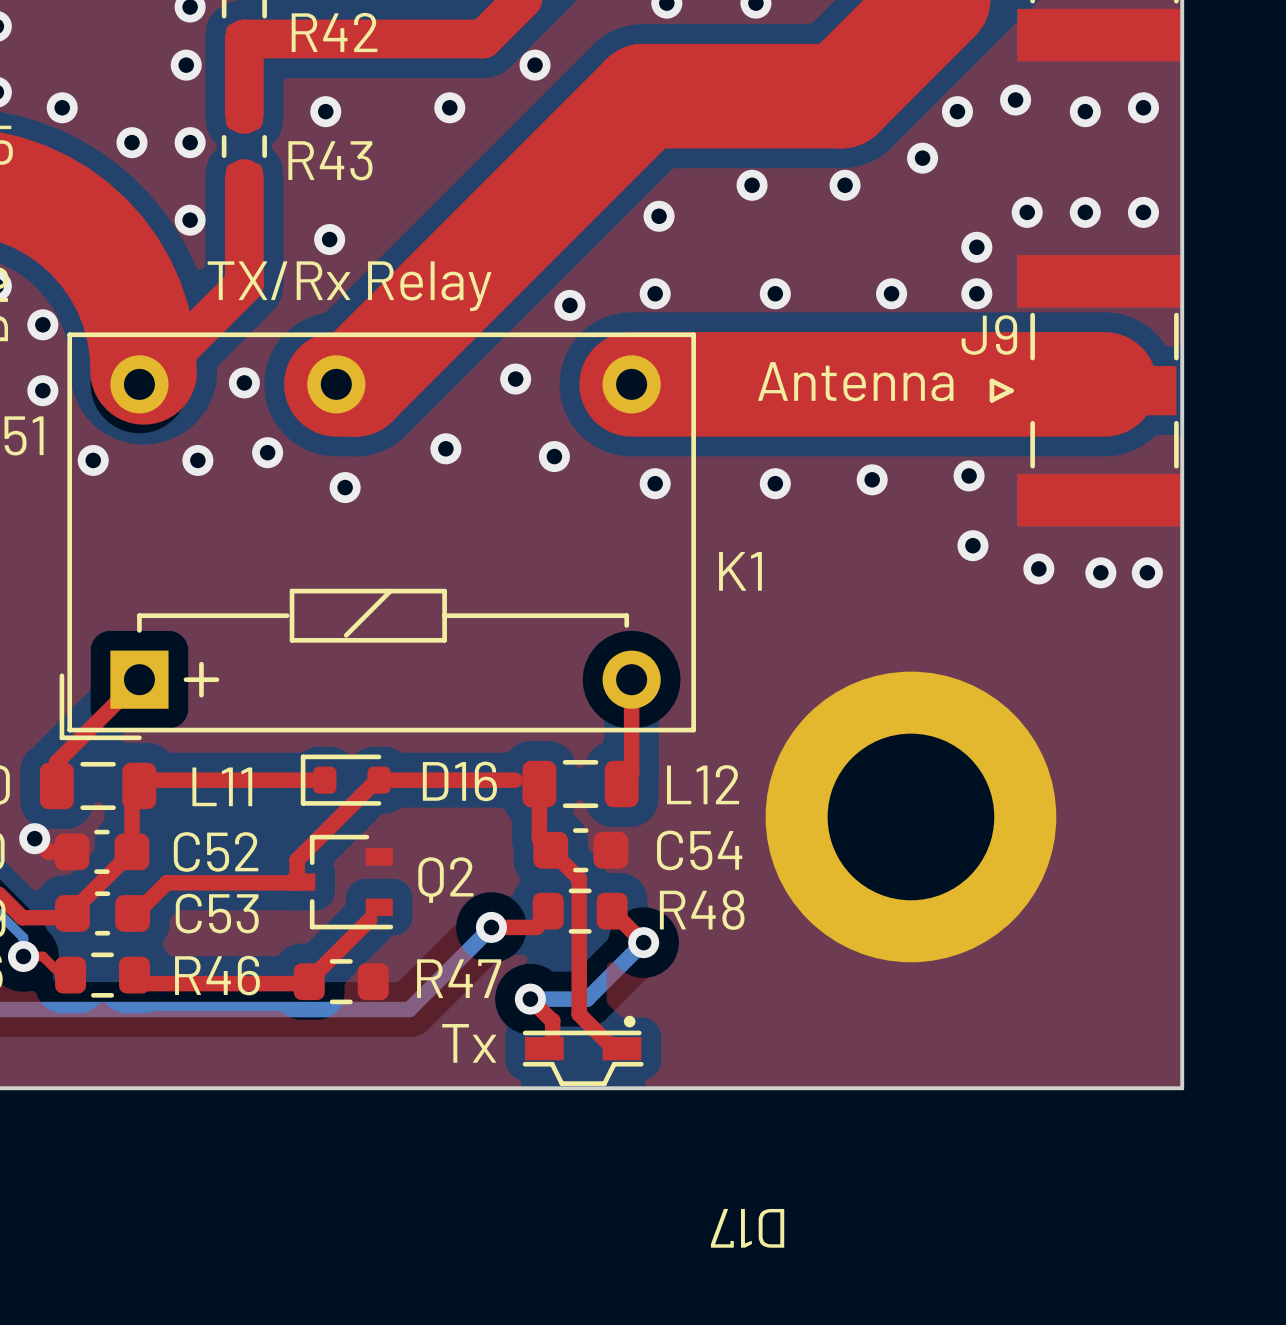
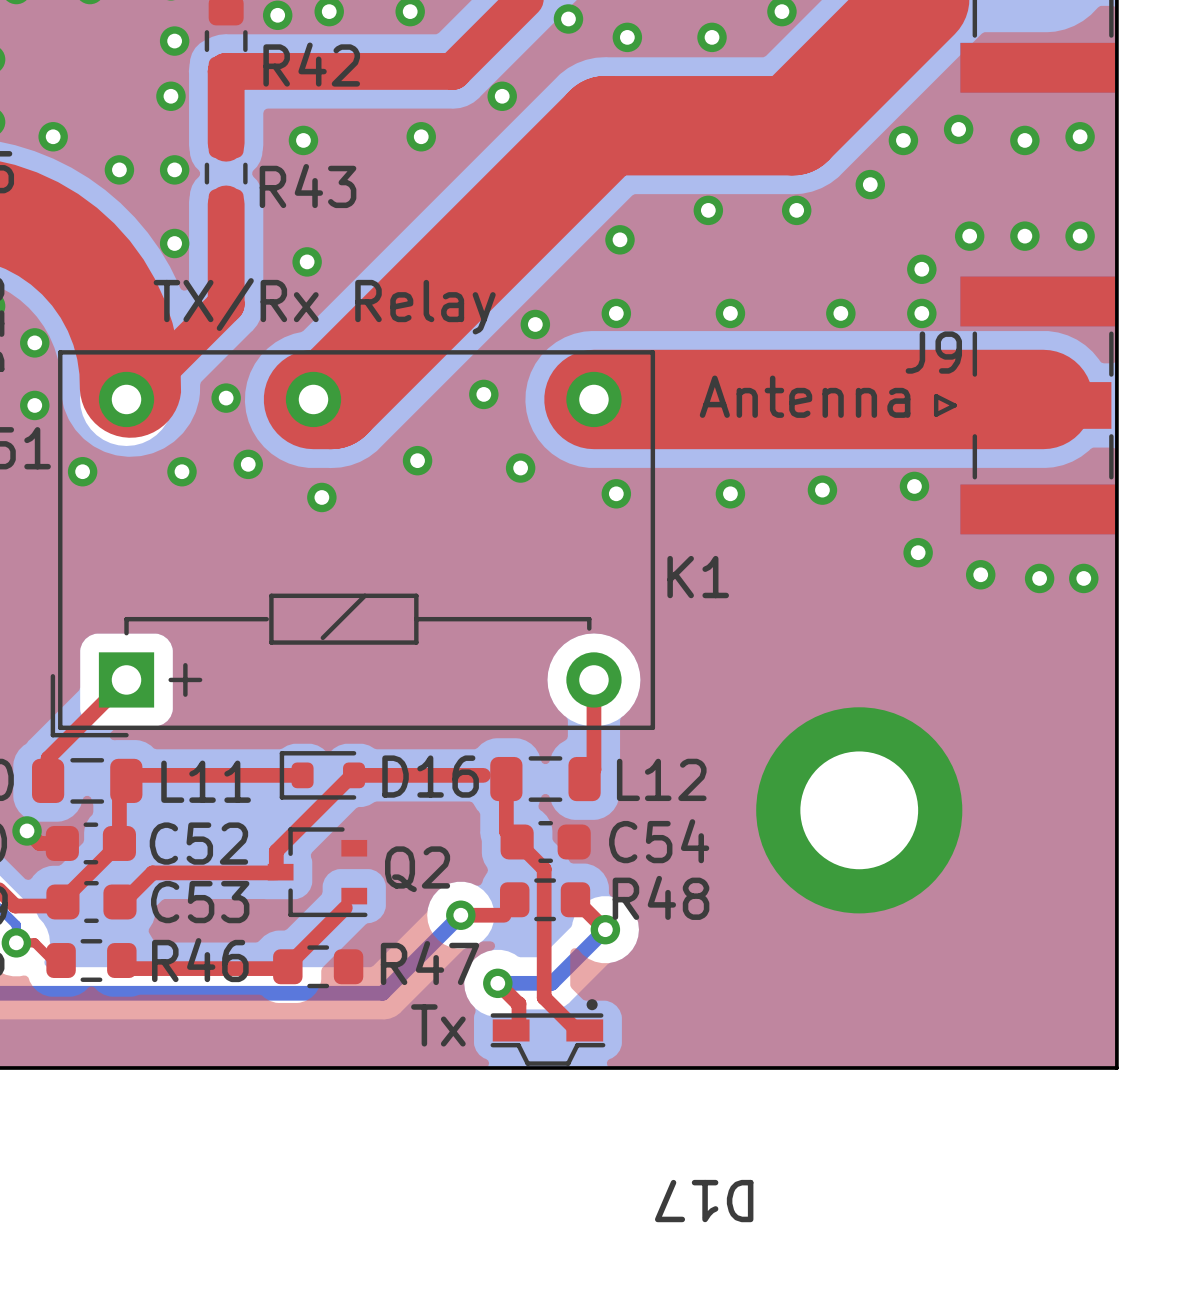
part footprint: [765, 671, 1057, 963] -> [756, 707, 963, 914]

